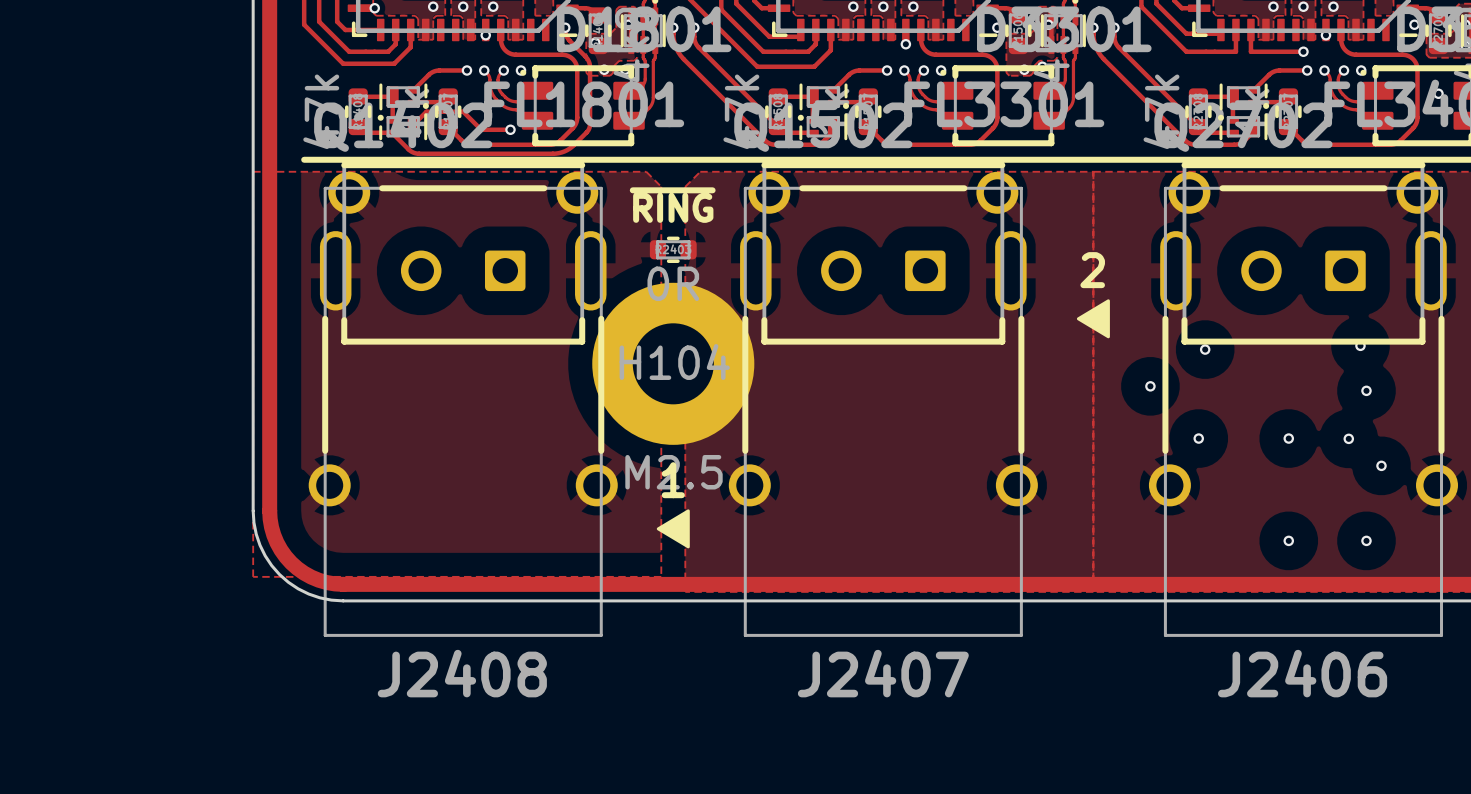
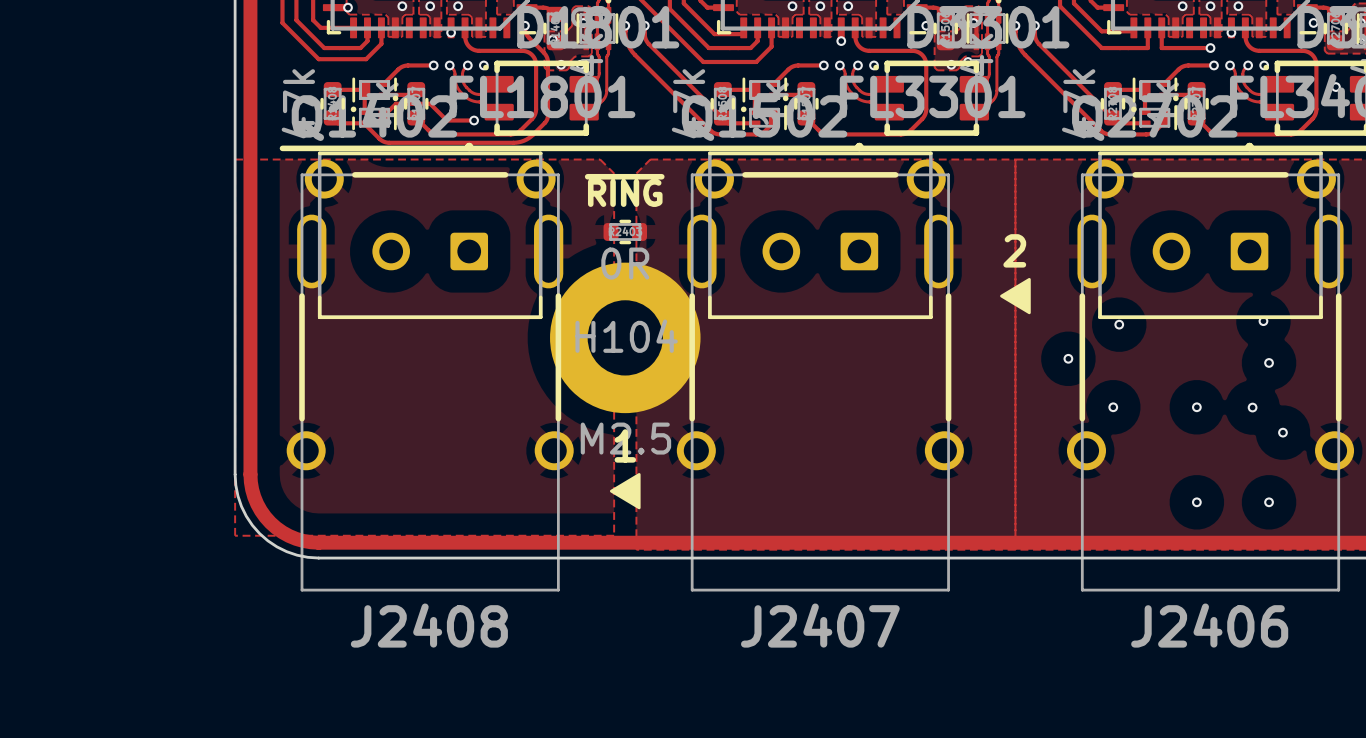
J2408 footprint: [308, 162, 618, 637] -> [286, 142, 574, 592]
J2407 footprint: [728, 162, 1038, 637] -> [676, 142, 964, 592]
J2406 footprint: [1148, 162, 1459, 637] -> [1066, 142, 1355, 592]

